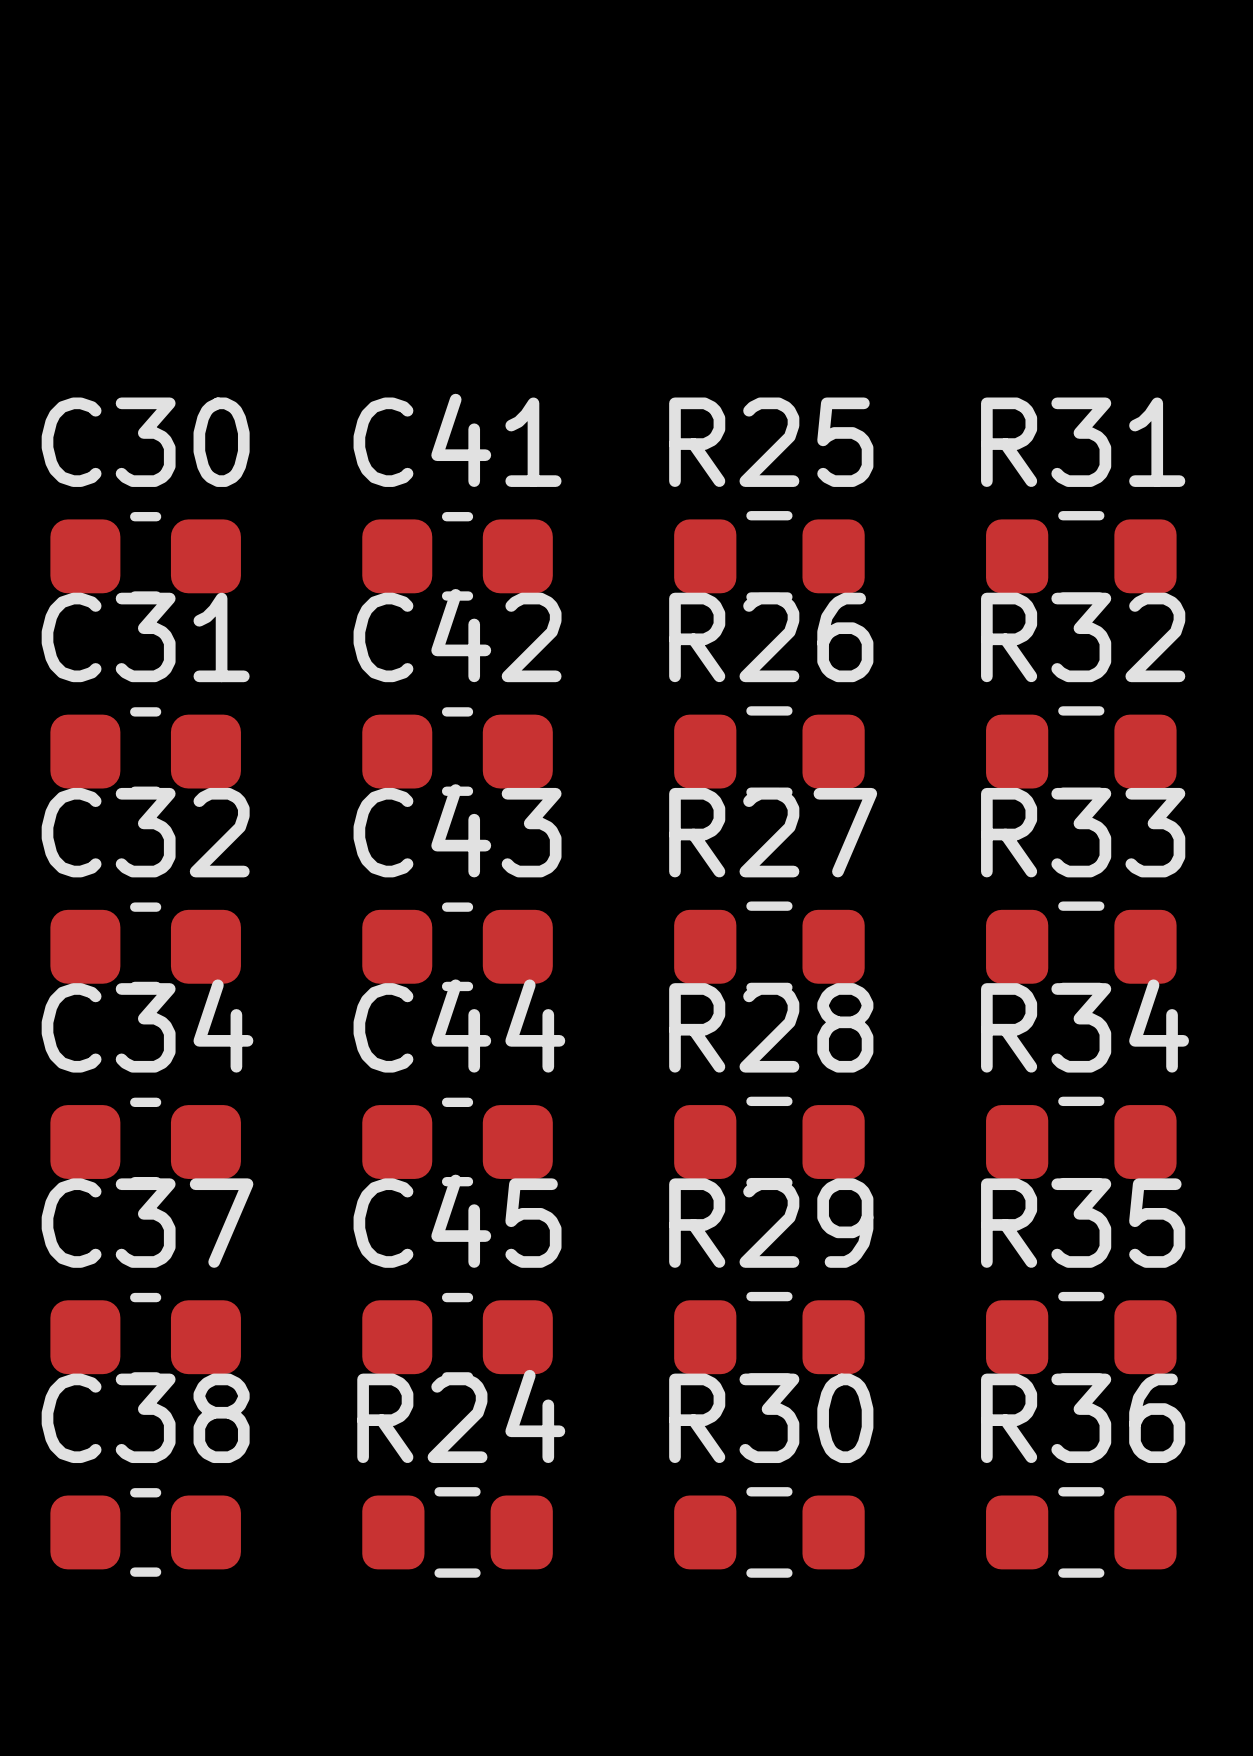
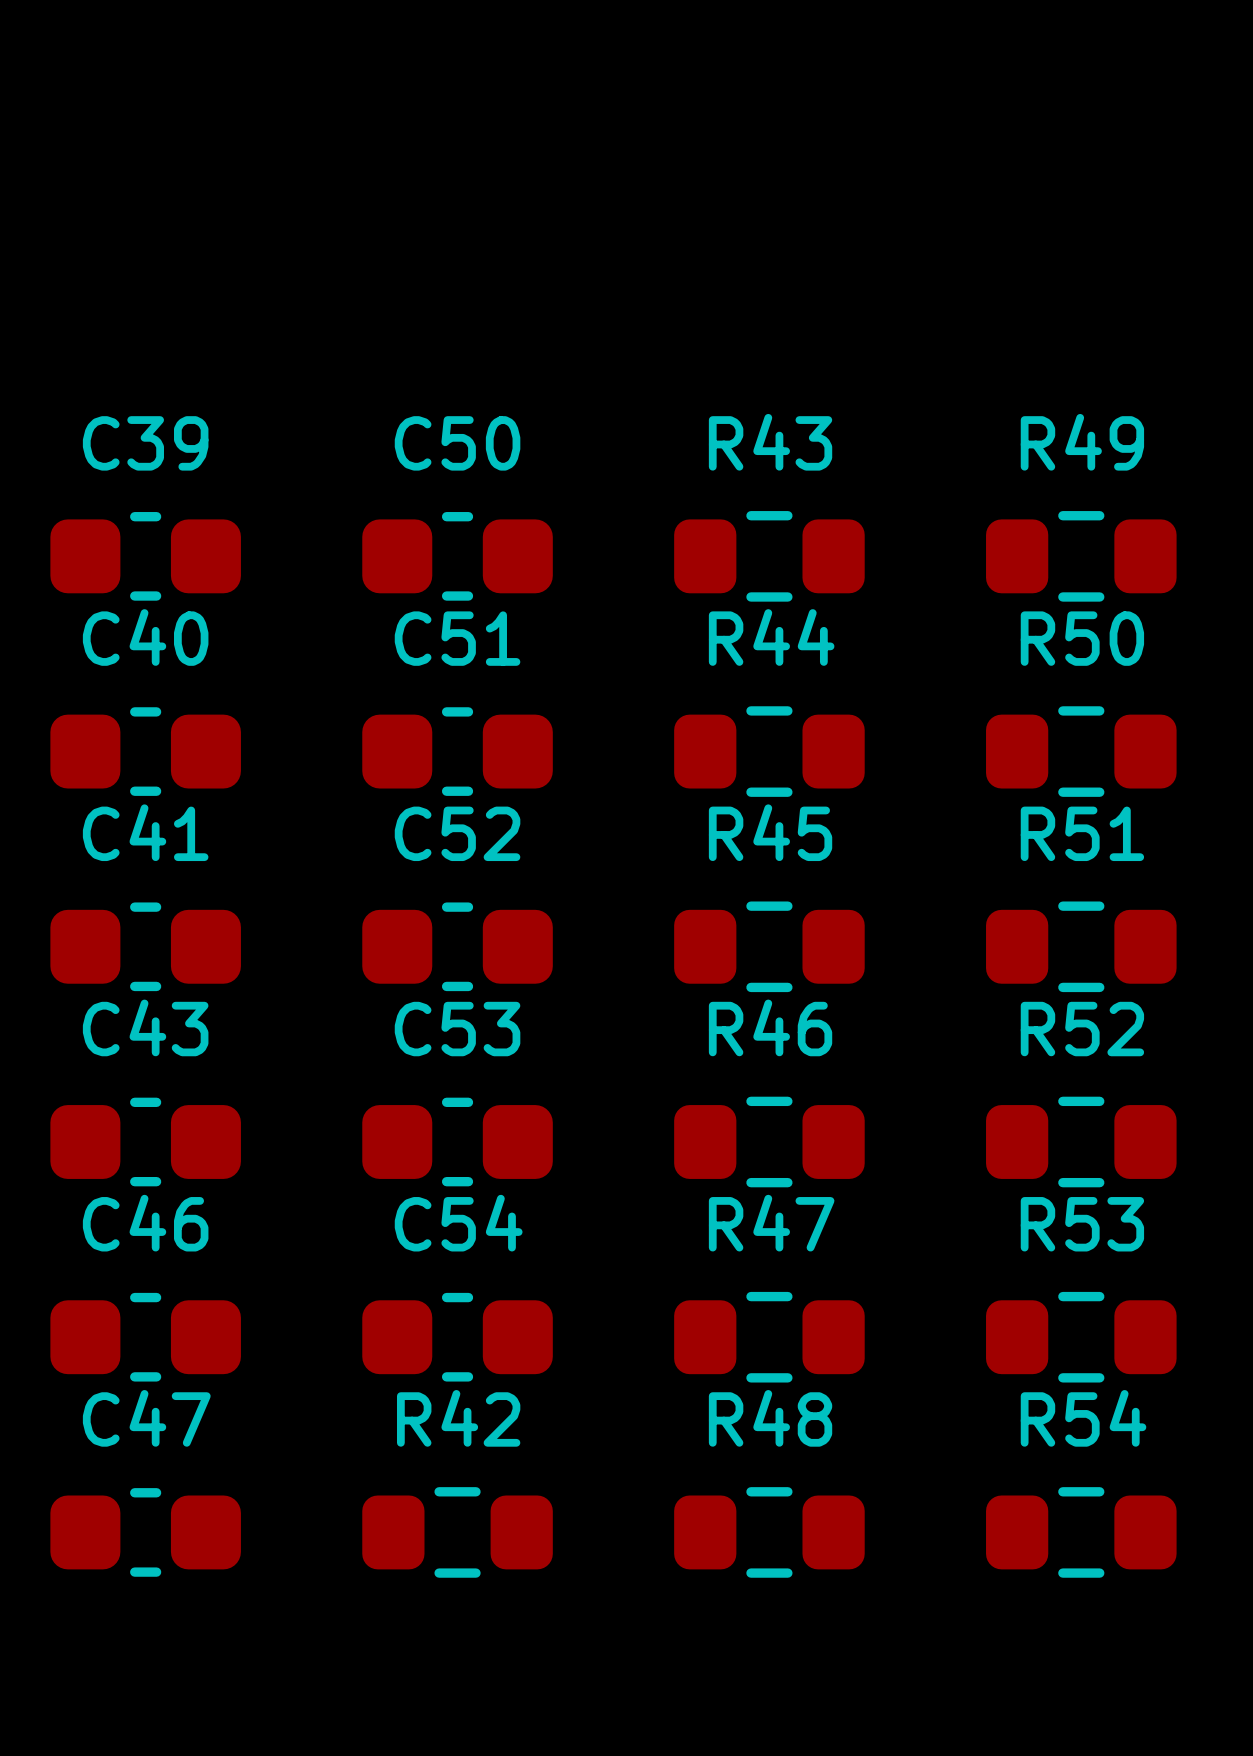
C41 name: C41 (457, 440) -> C50 (457, 443)
C30 name: C30 (145, 442) -> C39 (145, 443)
R25 name: R25 (771, 442) -> R43 (770, 442)
R31 name: R31 (1083, 442) -> R49 (1082, 442)
C42 name: C42 (457, 635) -> C51 (457, 638)
C31 name: C31 (145, 637) -> C40 (145, 637)
R26 name: R26 (771, 637) -> R44 (771, 637)
R32 name: R32 (1083, 637) -> R50 (1082, 638)
C43 name: C43 (457, 830) -> C52 (457, 833)
C32 name: C32 (145, 832) -> C41 (145, 832)
R27 name: R27 (773, 832) -> R45 (770, 832)
R33 name: R33 (1083, 832) -> R51 (1082, 833)
C34 name: C34 (147, 1026) -> C43 (145, 1027)
C44 name: C44 (459, 1026) -> C53 (457, 1029)
R34 name: R34 (1085, 1026) -> R52 (1082, 1029)
R28 name: R28 (771, 1027) -> R46 (770, 1027)
C45 name: C45 (457, 1221) -> C54 (458, 1223)
C37 name: C37 (147, 1223) -> C46 (145, 1223)
R29 name: R29 (771, 1223) -> R47 (771, 1223)
R35 name: R35 (1083, 1223) -> R53 (1082, 1224)
R24 name: R24 (461, 1416) -> R42 (458, 1418)
C38 name: C38 (145, 1418) -> C47 (146, 1418)
R30 name: R30 (771, 1418) -> R48 (770, 1418)
R36 name: R36 (1083, 1418) -> R54 (1083, 1418)

